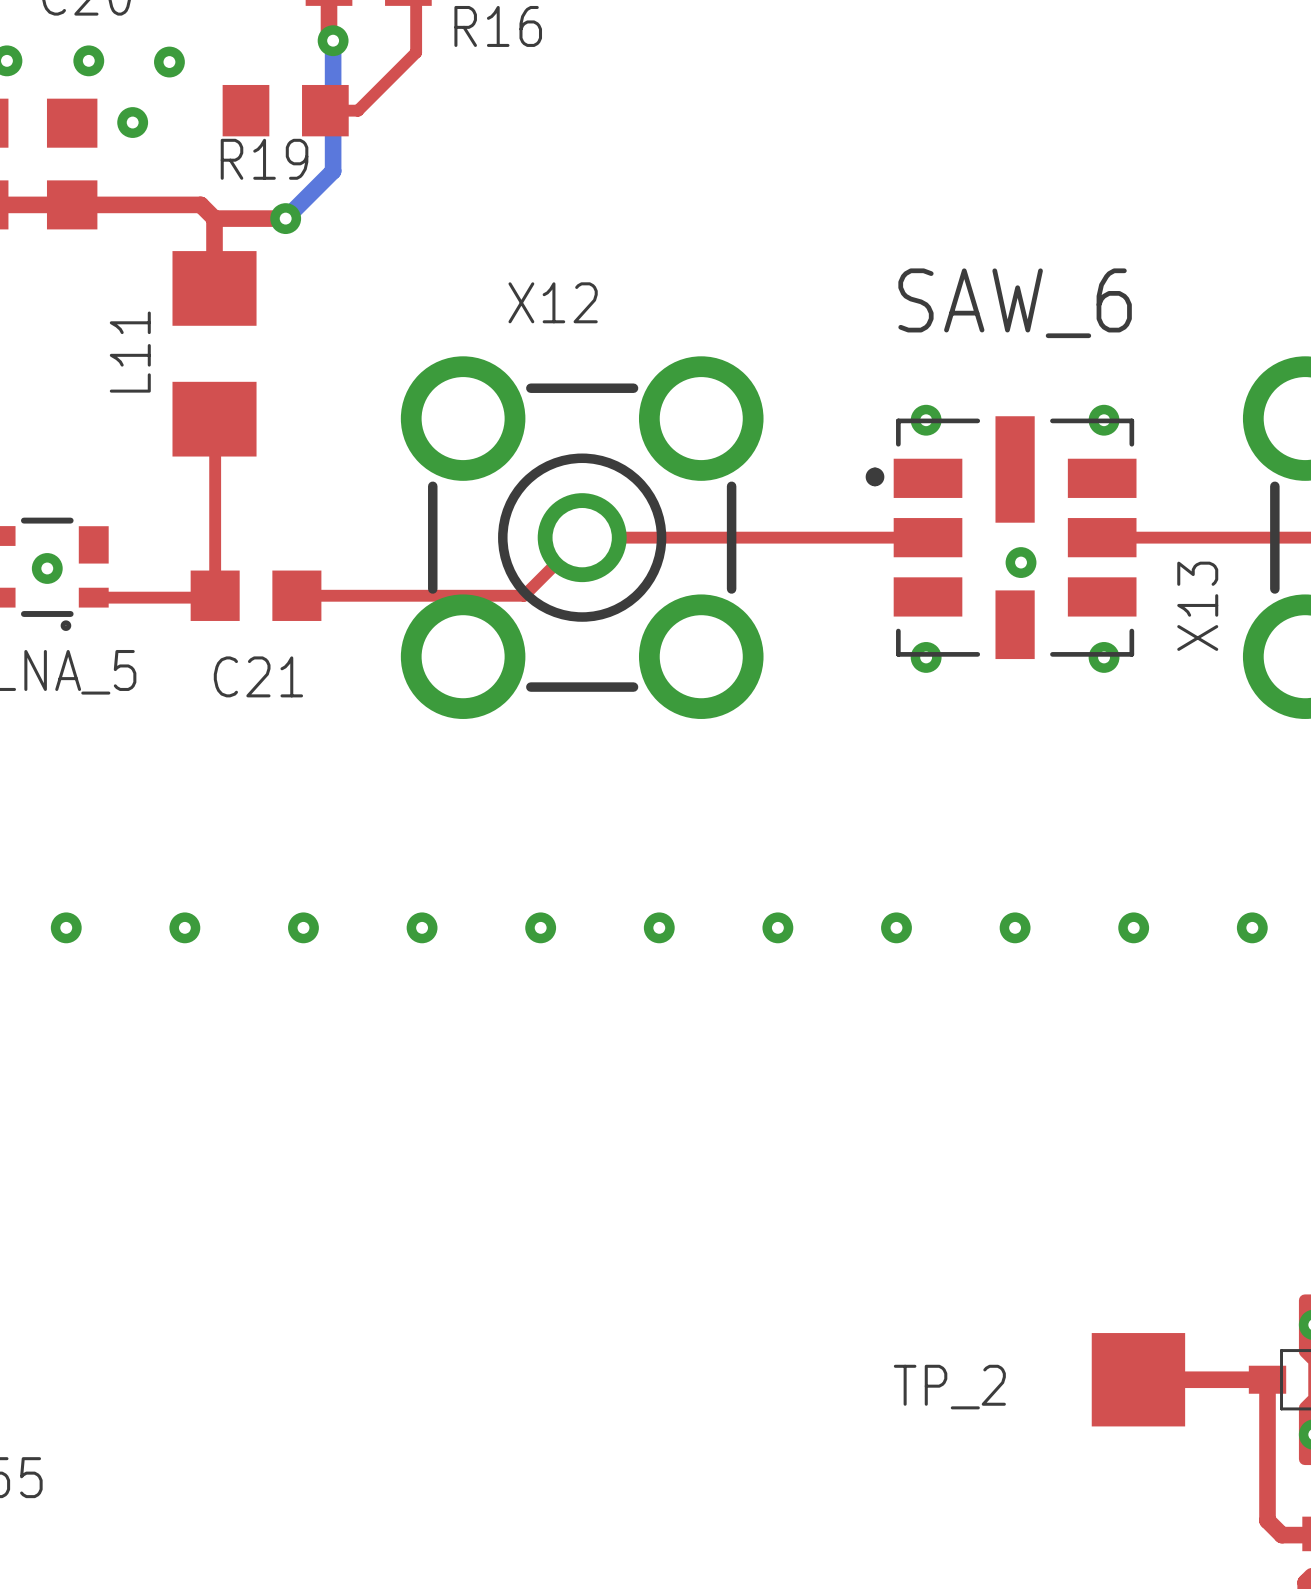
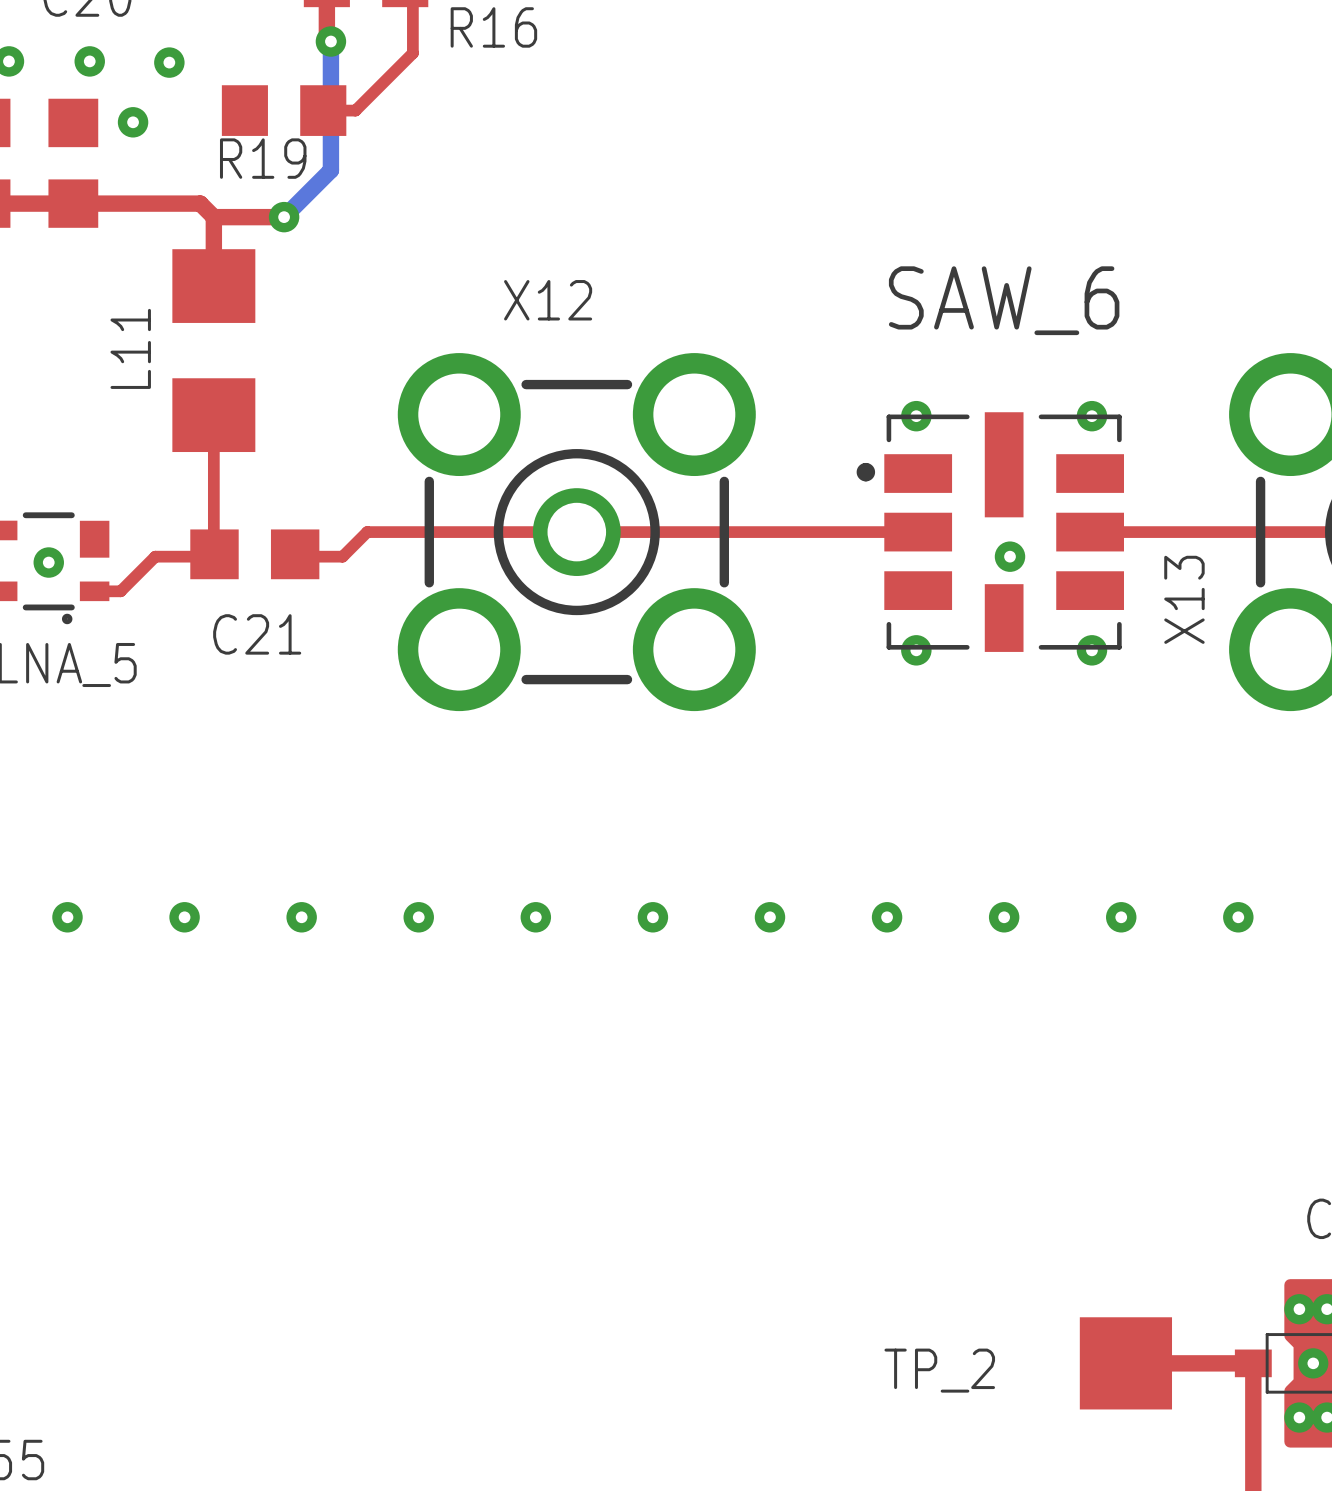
top track: (215, 419) (215, 595) (213, 597) (120, 597) -> (213, 415) (213, 553)
top track: (582, 537) (524, 595) (296, 595) -> (576, 532) (367, 532) (342, 556) (297, 556) (295, 554)
top track: none -> (214, 554) (212, 556) (155, 556) (120, 591)
C21 position: (256, 595) -> (254, 554)

